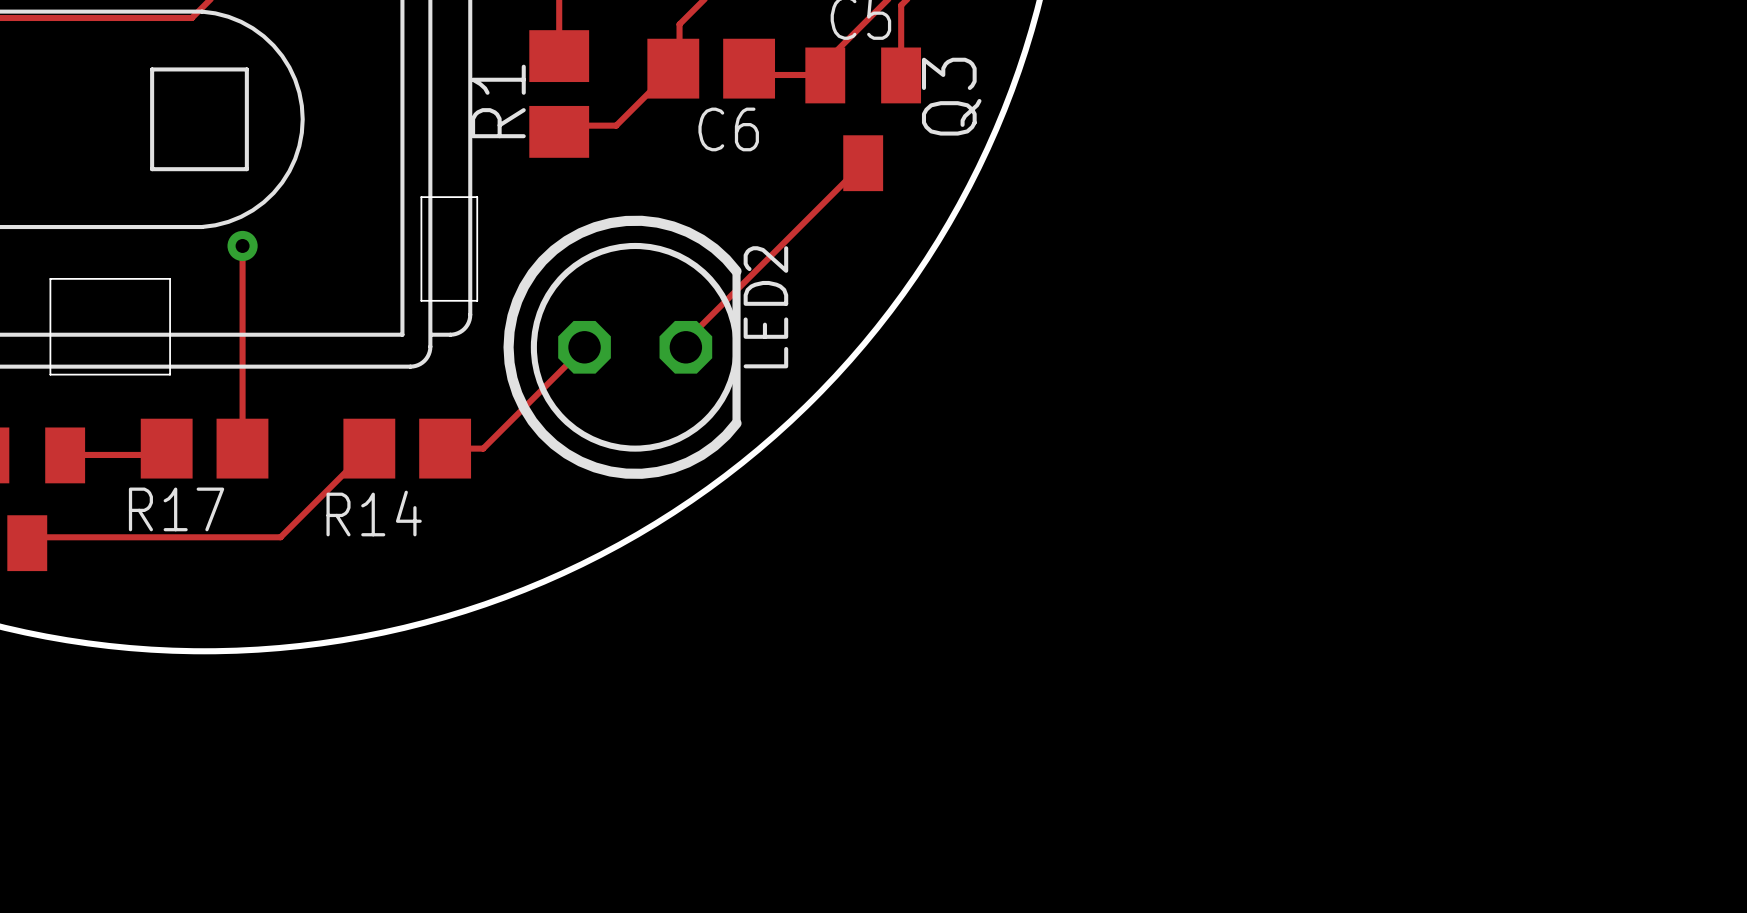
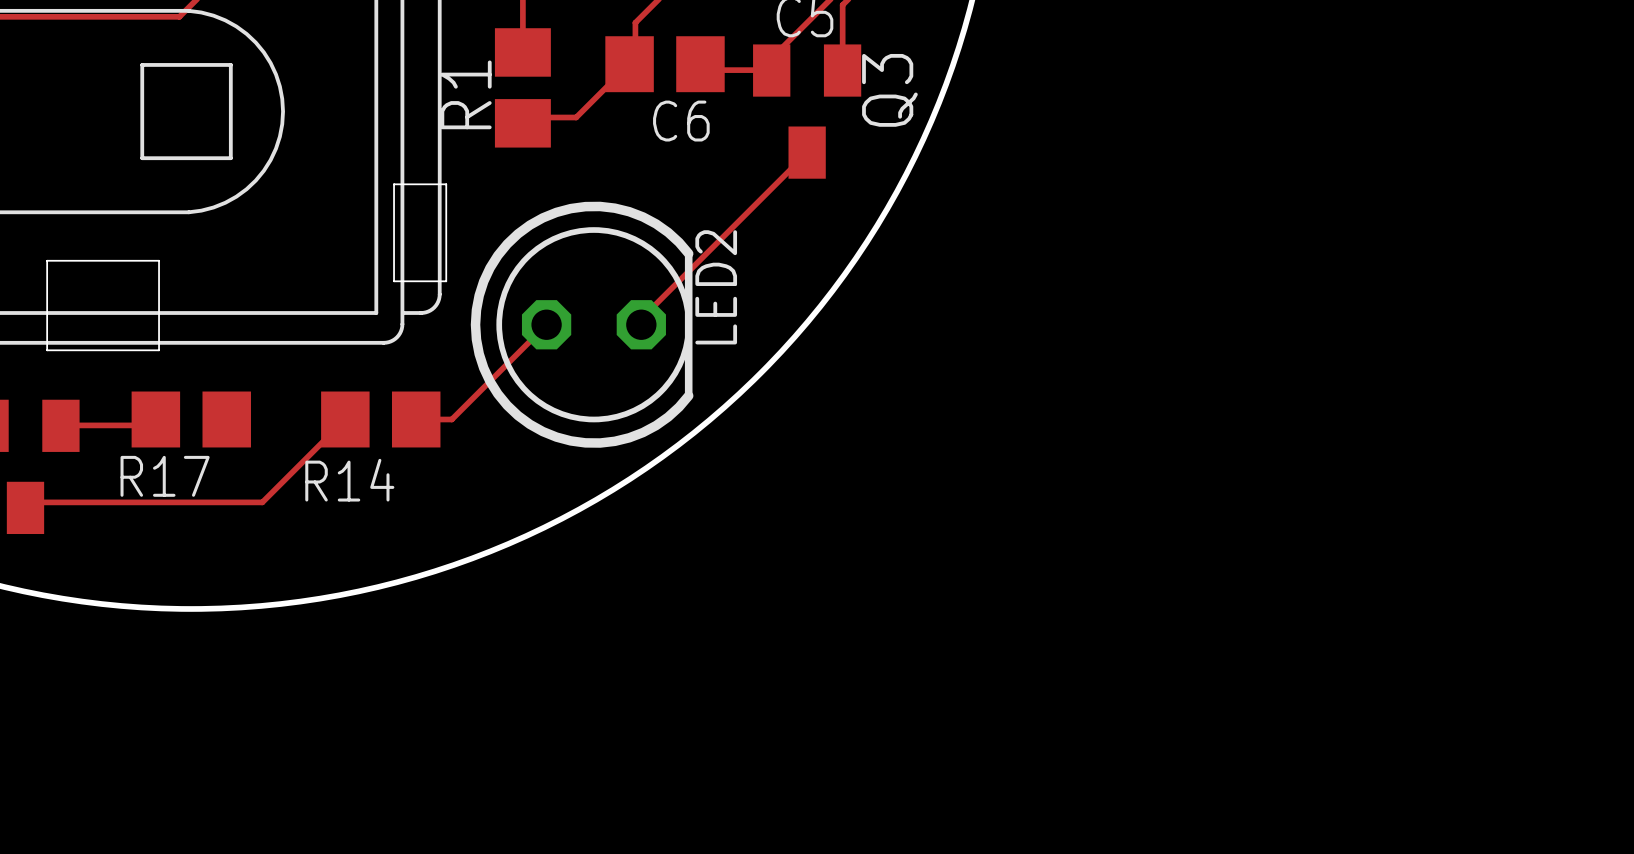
track: (242, 245) (242, 448) -> none
via: (242, 245) -> none

